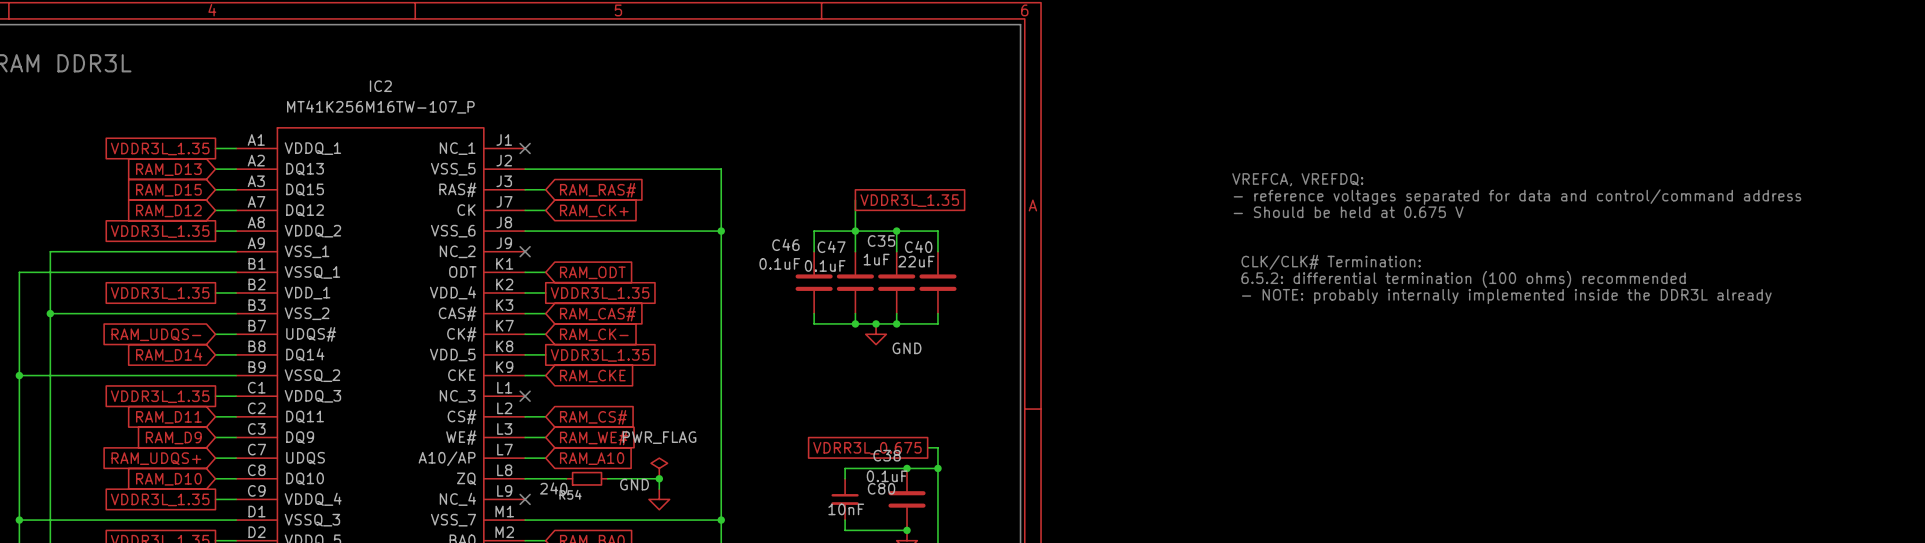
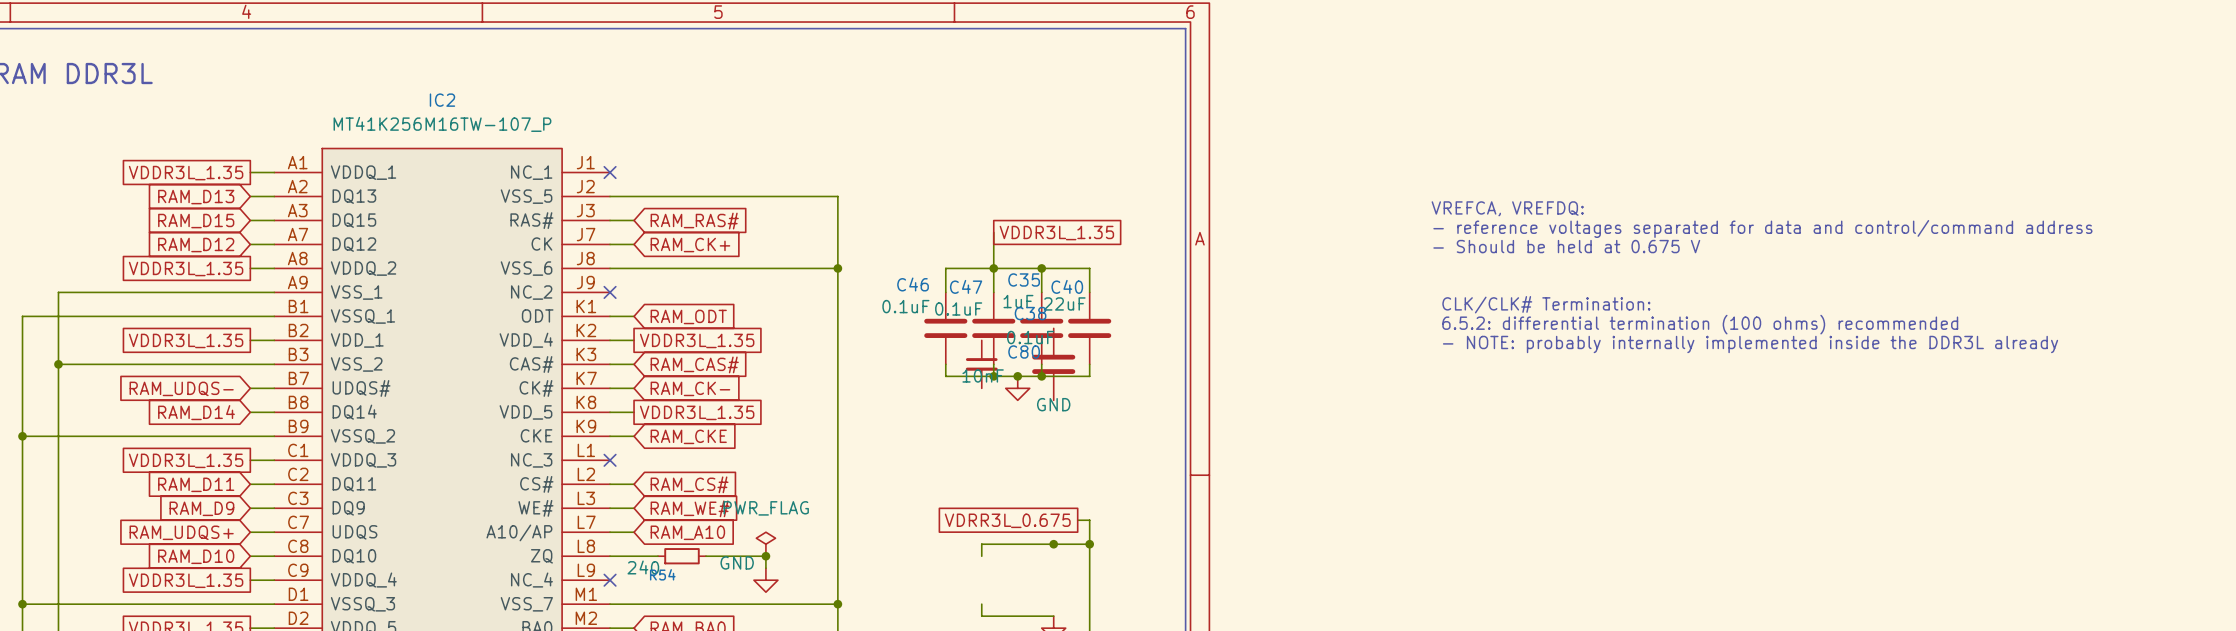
C80 position: (845, 499) -> (981, 364)
C38 position: (907, 499) -> (1053, 364)
junction: (907, 530) -> none

